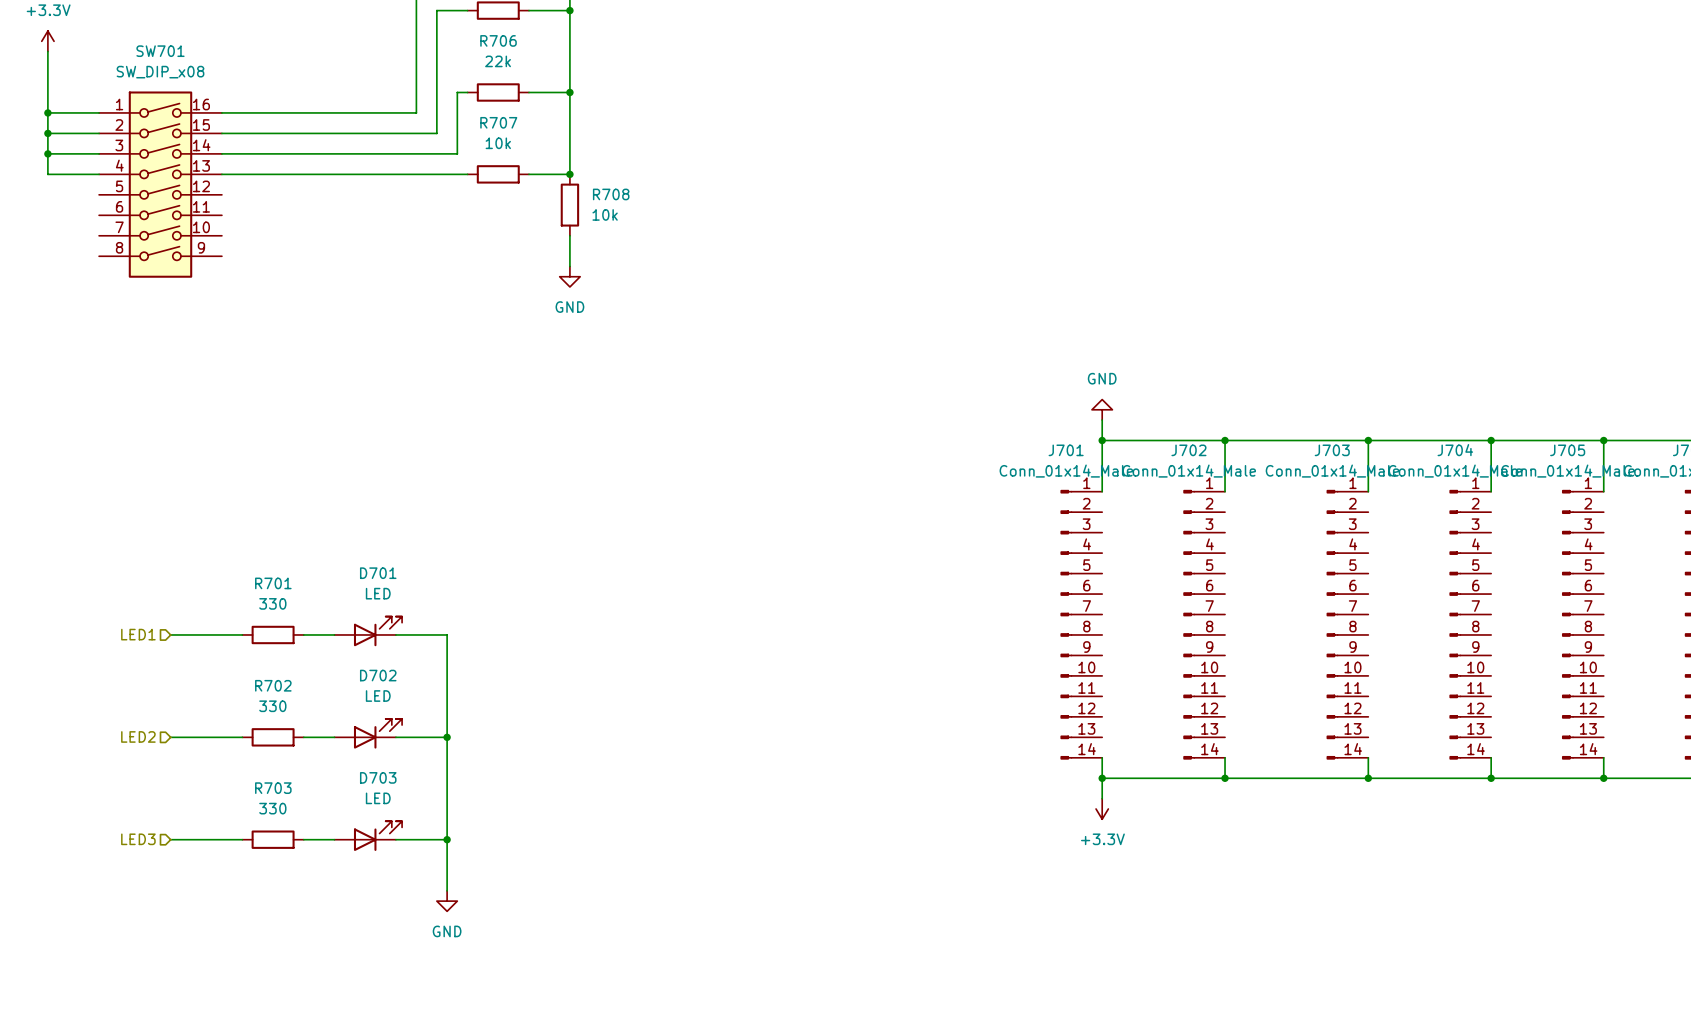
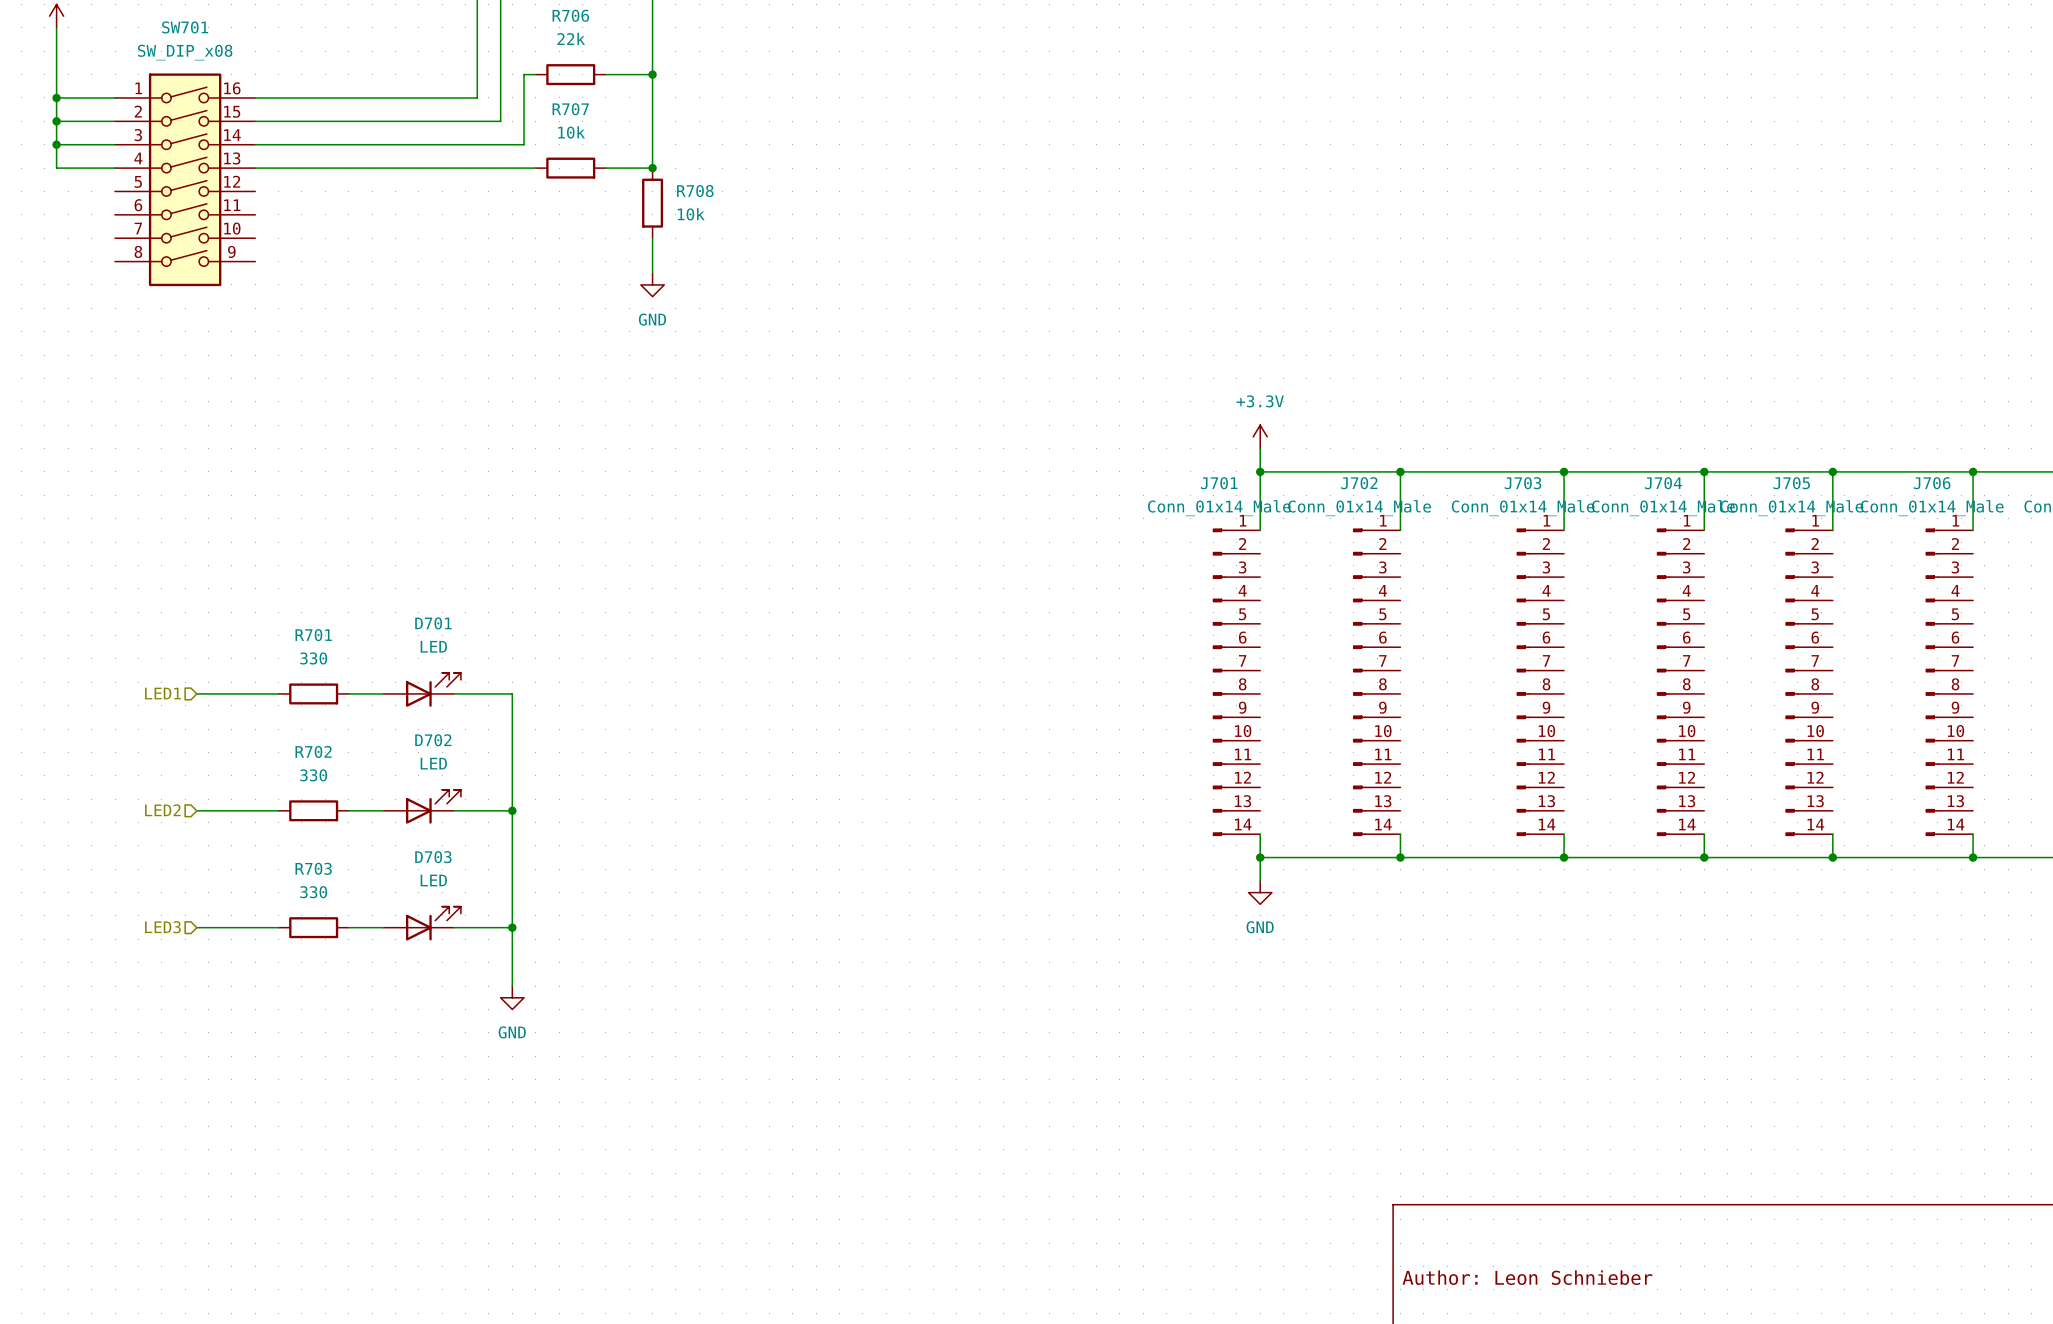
power symbol: GND (1102, 409) -> +3.3V (1260, 436)
power symbol: +3.3V (1102, 808) -> GND (1260, 892)

